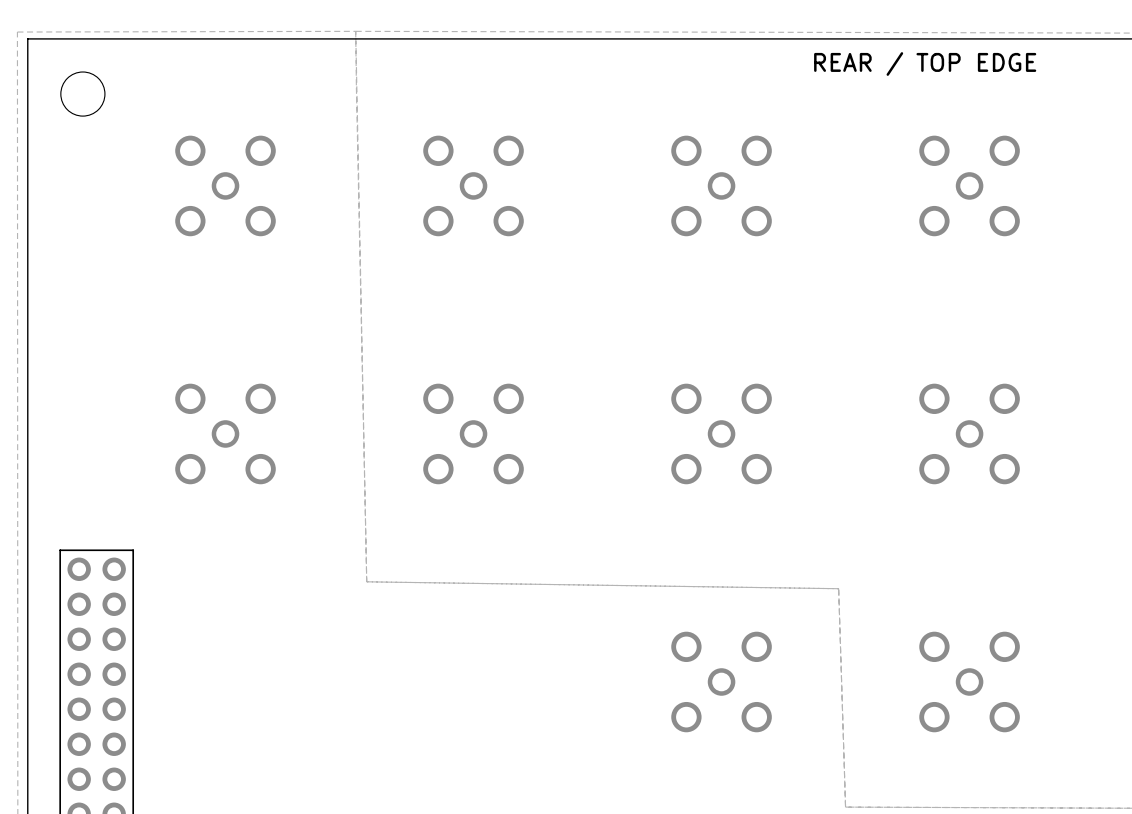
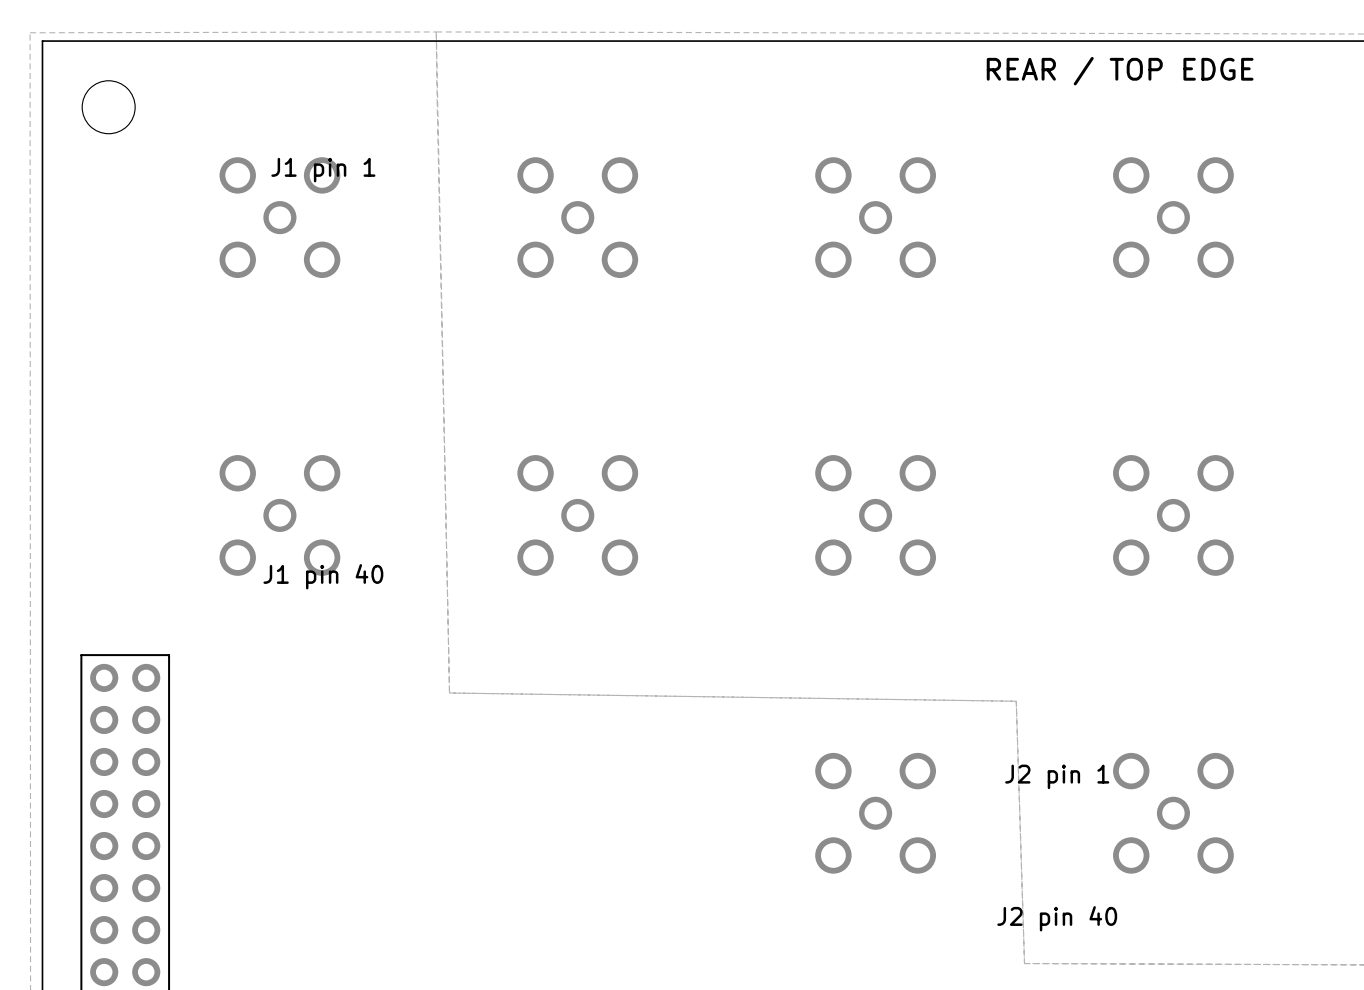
text: none -> J1 pin 1 (323, 170)
text: none -> J1 pin 40 (323, 576)
text: none -> J2 pin 1 (1057, 776)
text: none -> J2 pin 40 (1057, 918)

